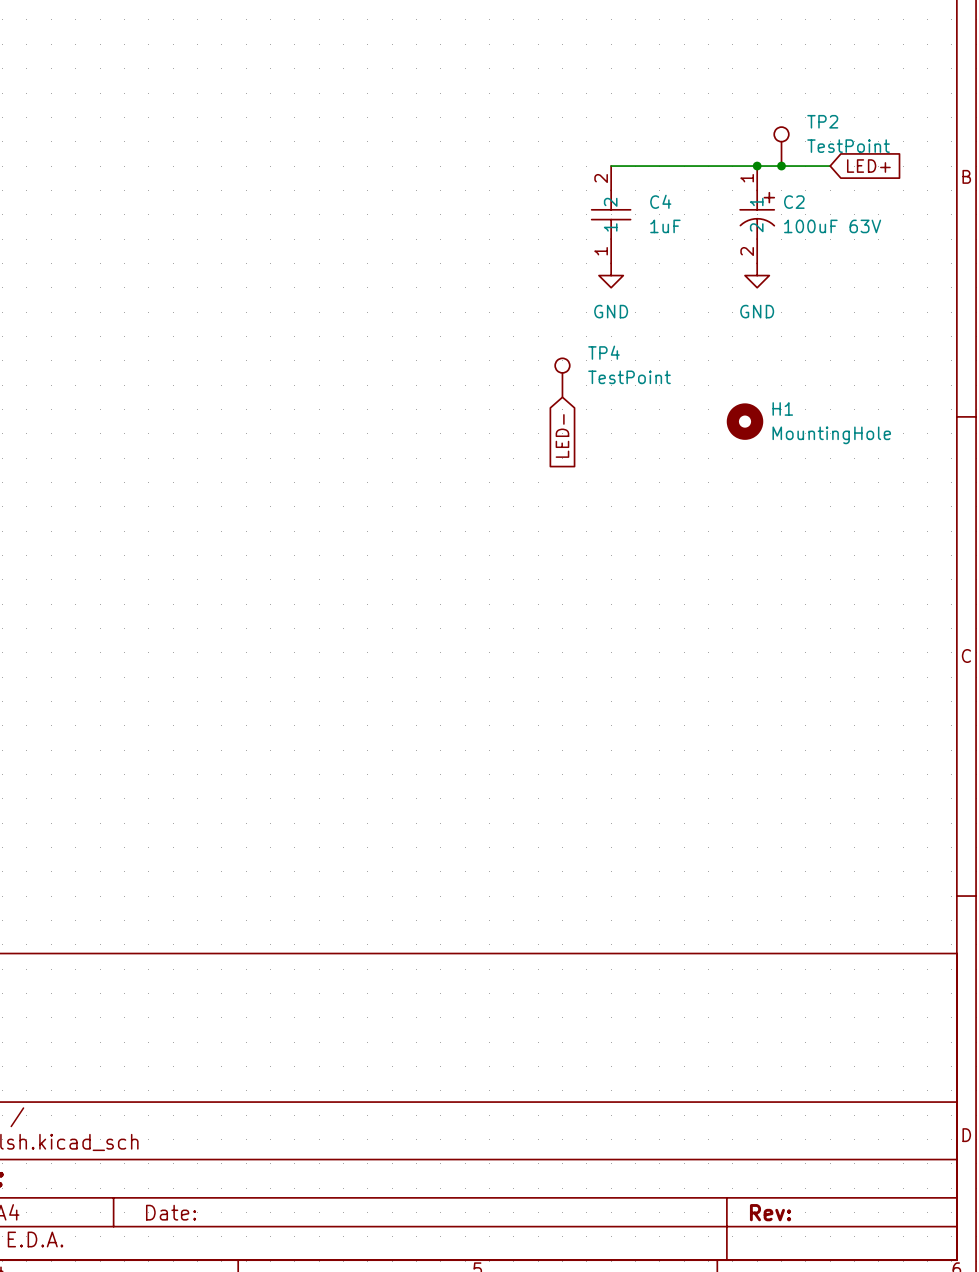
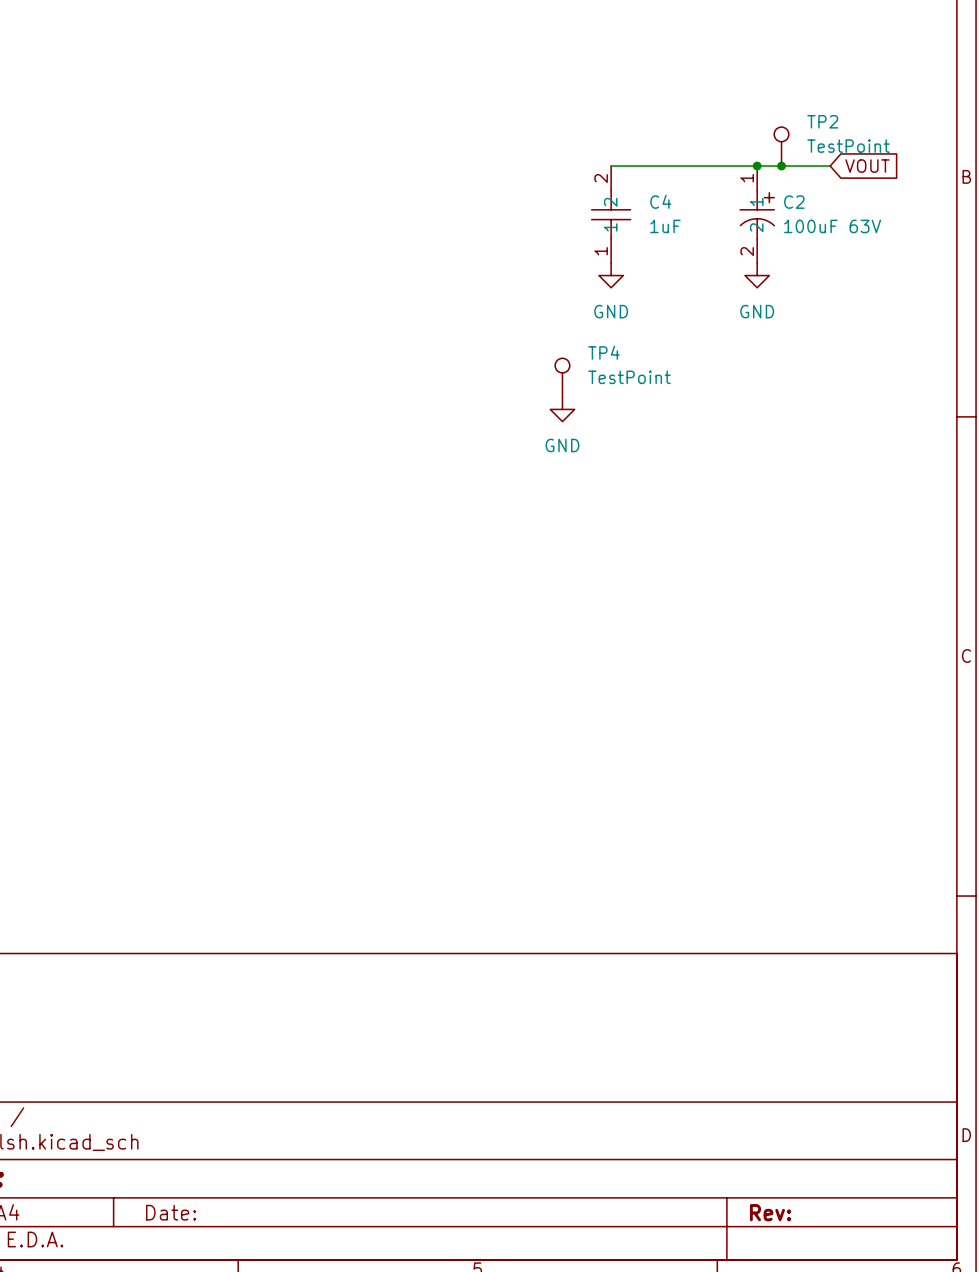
global label: LED+ (868, 166) -> VOUT (867, 166)
power symbol: none -> GND (562, 409)
H1: MountingHole (745, 421) -> none
global label: LED- (562, 435) -> none

